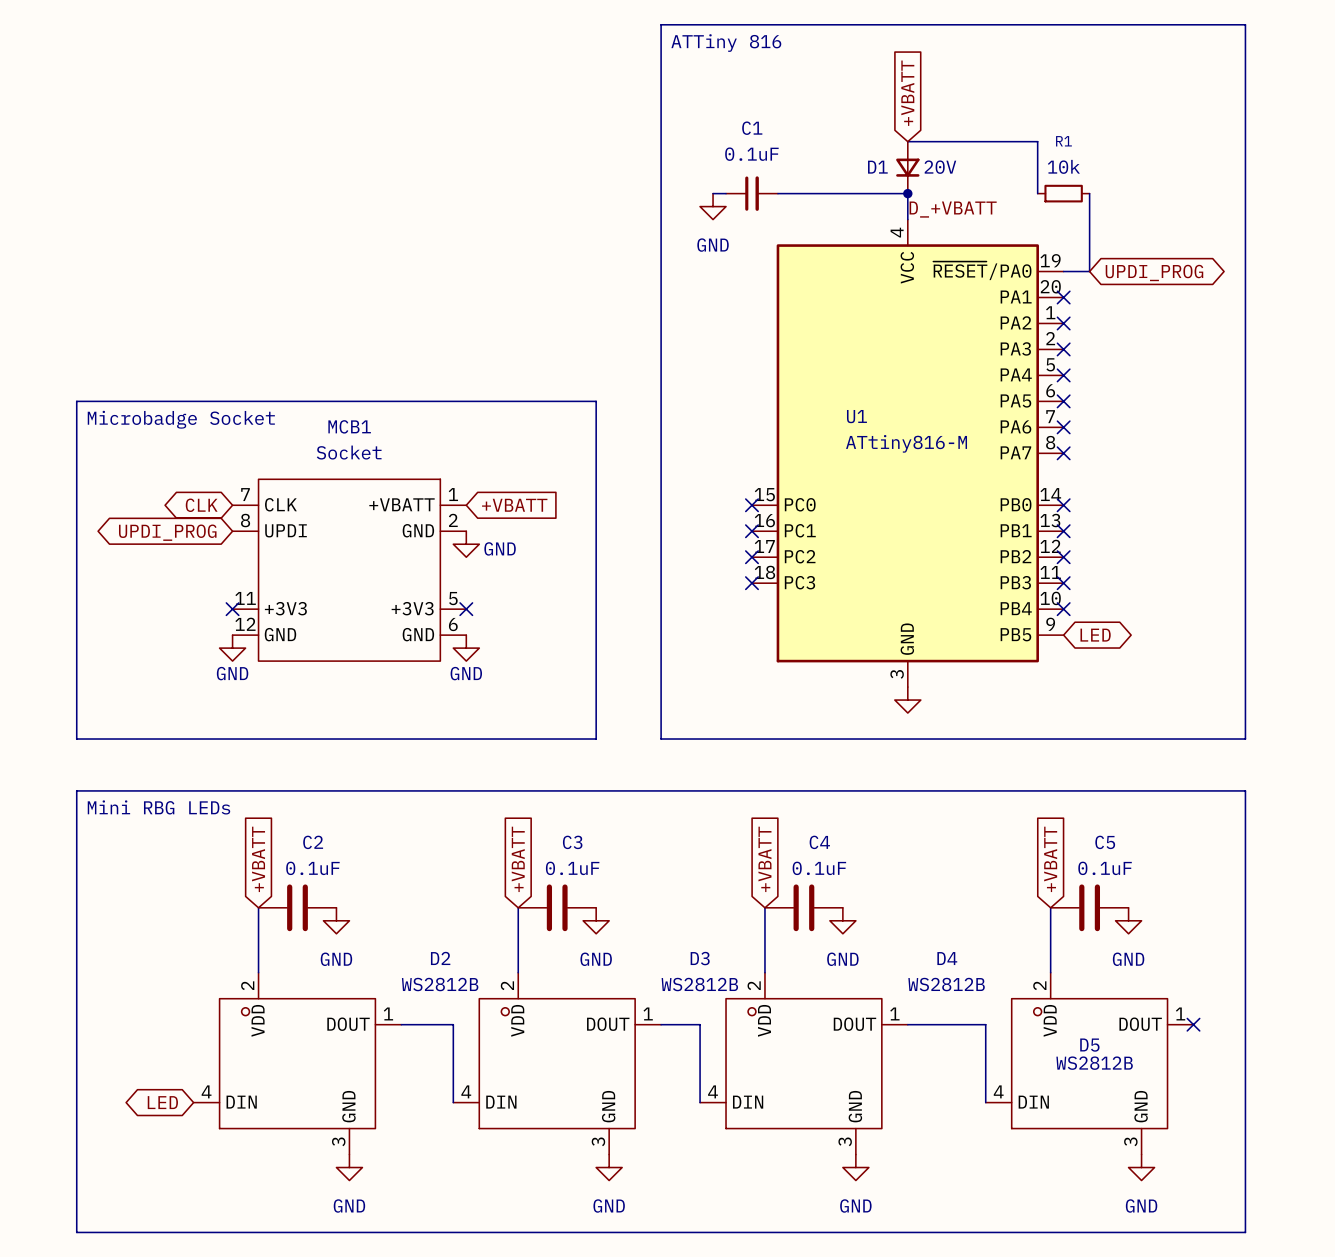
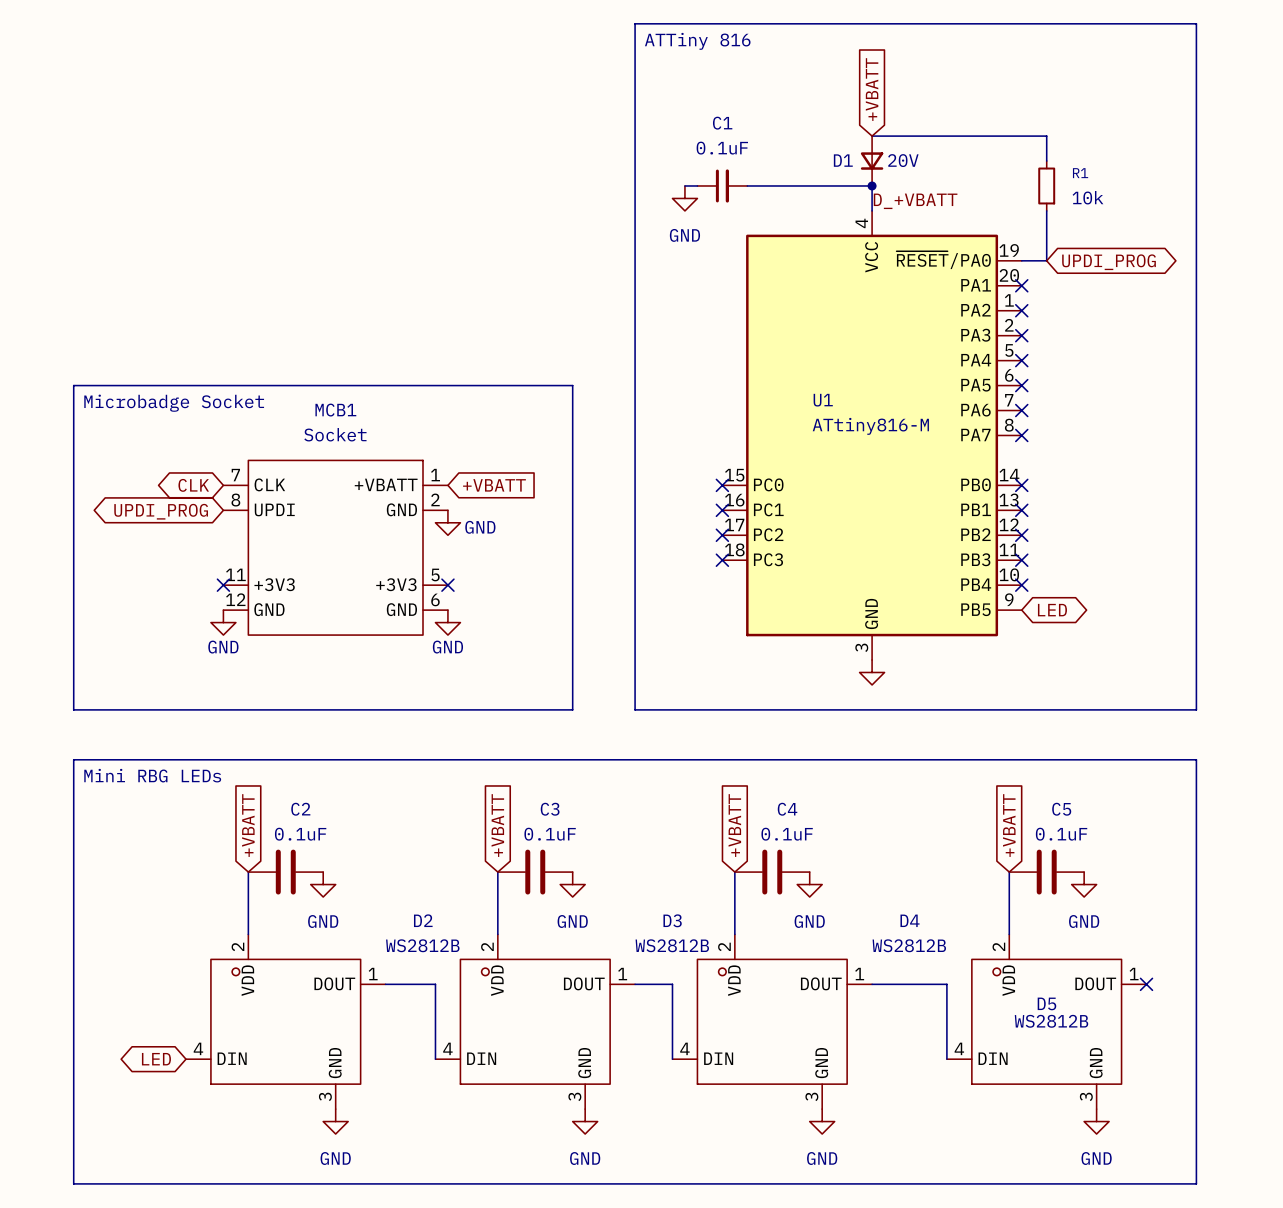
wire: (1037, 141) (1037, 193) -> (996, 136) (1046, 136) (1046, 161)
R1 value position: 10k (1063, 166) -> 10k (1087, 197)
R1 rotation: 0° (1063, 193) -> 90° clockwise (1046, 185)
wire: (1089, 193) (1089, 219) -> none

